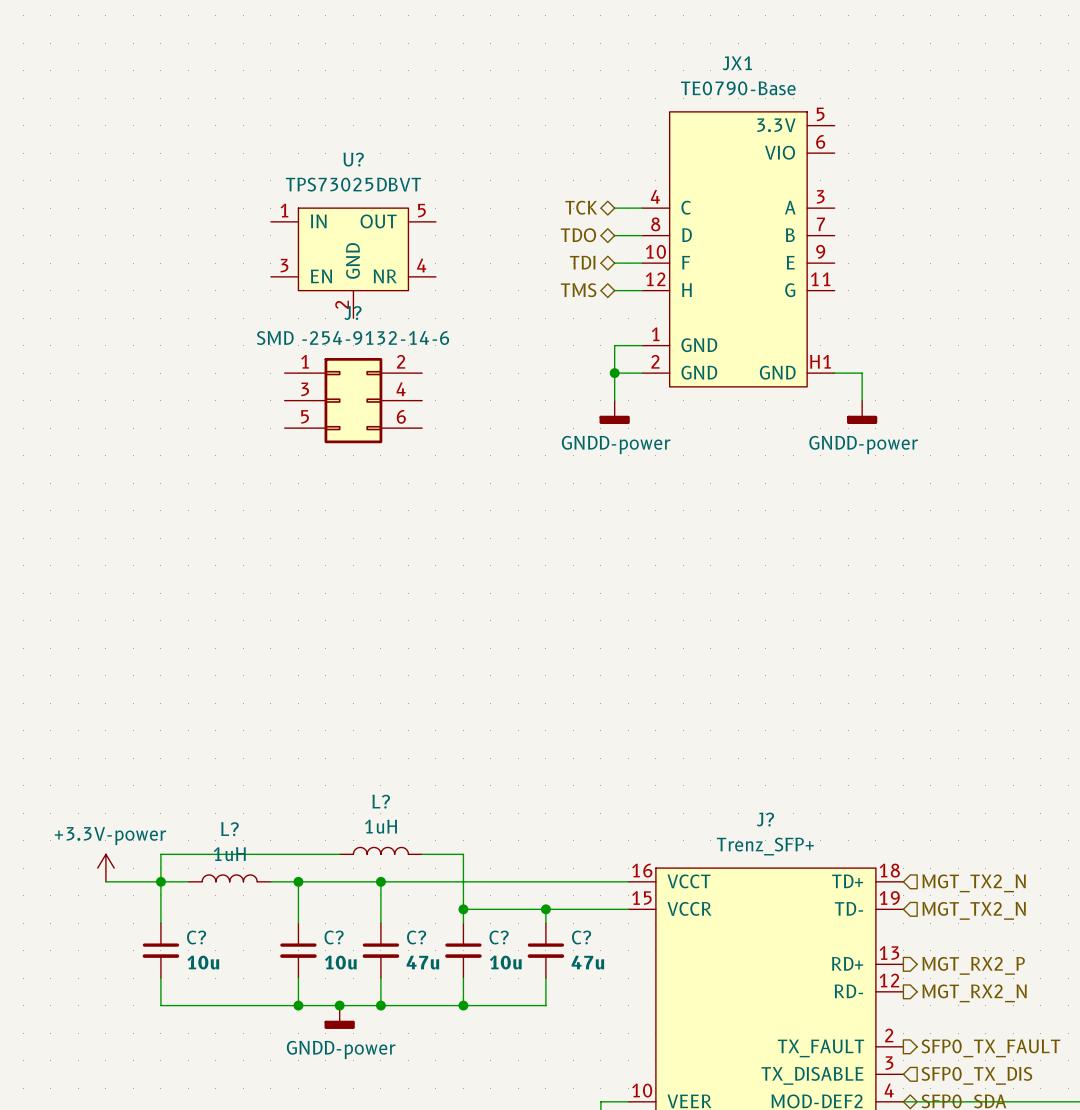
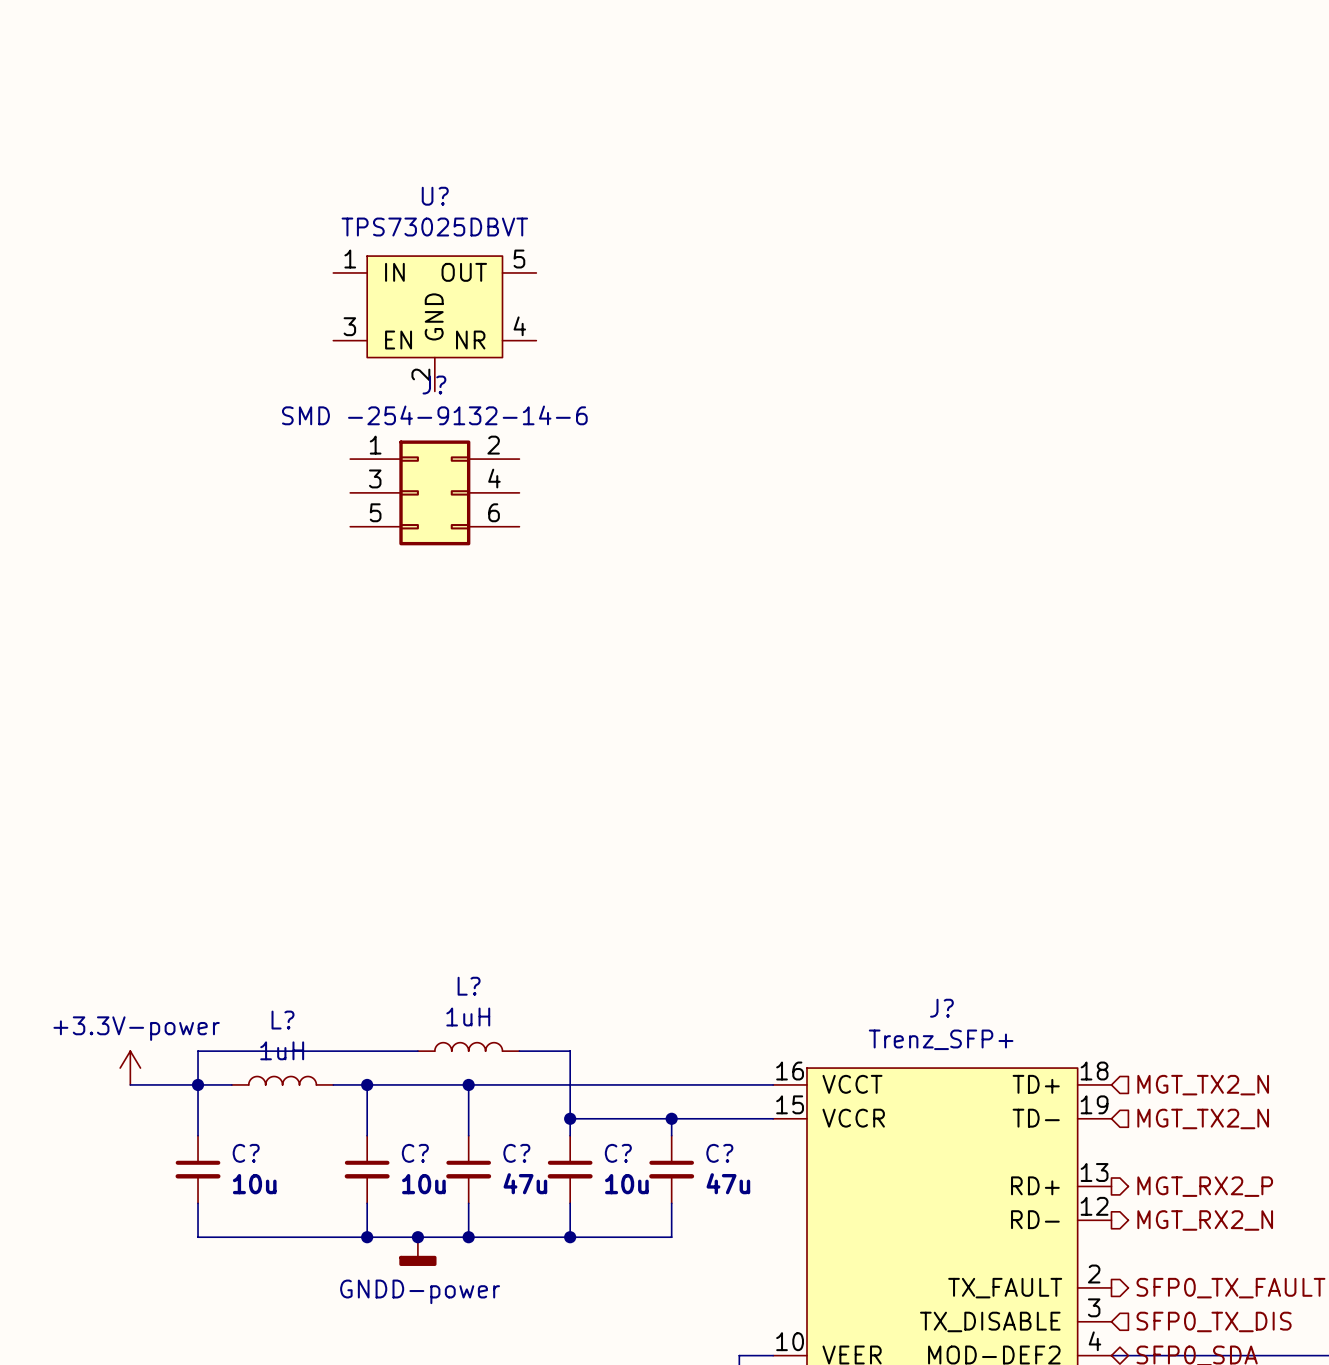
hierarchical label: TCK (581, 207) -> none
wire: (614, 208) (642, 208) -> none
hierarchical label: TDO (578, 235) -> none
wire: (614, 235) (642, 235) -> none
JX1: TE0790-Base (738, 249) -> none
hierarchical label: TDI (582, 262) -> none
wire: (614, 263) (642, 263) -> none
hierarchical label: TMS (578, 290) -> none
wire: (614, 290) (642, 290) -> none
wire: (642, 345) (614, 345) (614, 400) -> none
wire: (614, 373) (642, 373) -> none
junction: (614, 373) -> none
wire: (834, 373) (862, 373) (862, 400) -> none
power symbol: GNDD-power (614, 412) -> none
power symbol: GNDD-power (862, 412) -> none

